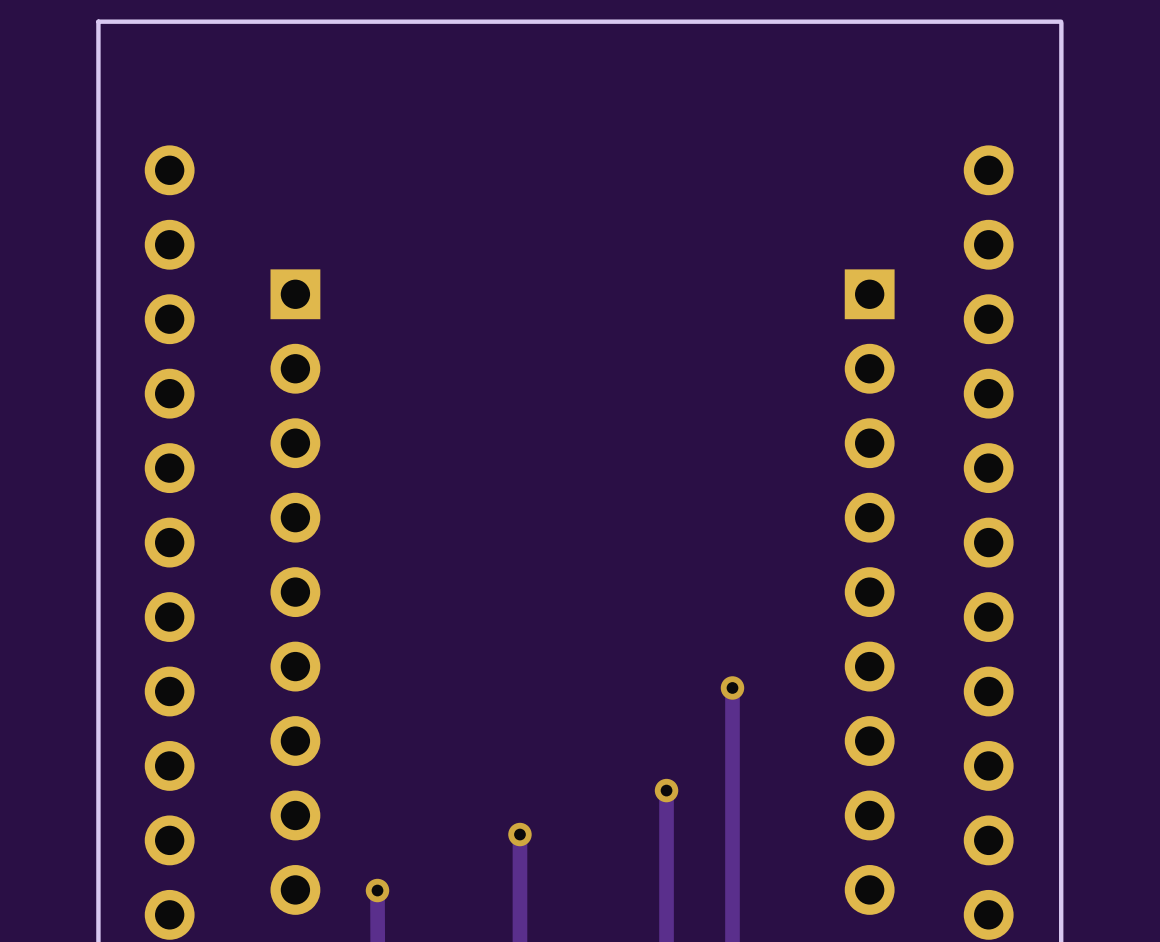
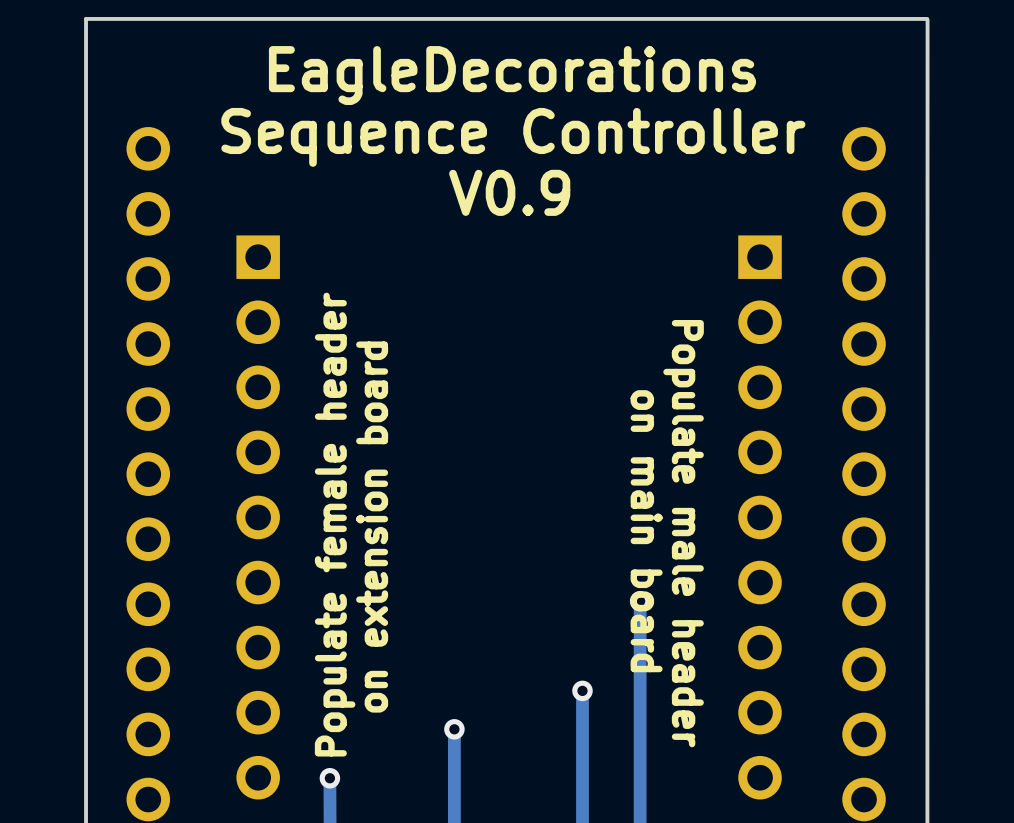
text: none -> EagleDecorations (512, 75)
text: none -> Sequence Controller (513, 137)
text: none -> V0.9 (509, 192)
text: none -> Populate female header (335, 524)
text: none -> on extension board (372, 527)
text: none -> on main board (646, 531)
text: none -> Populate male header (683, 533)

